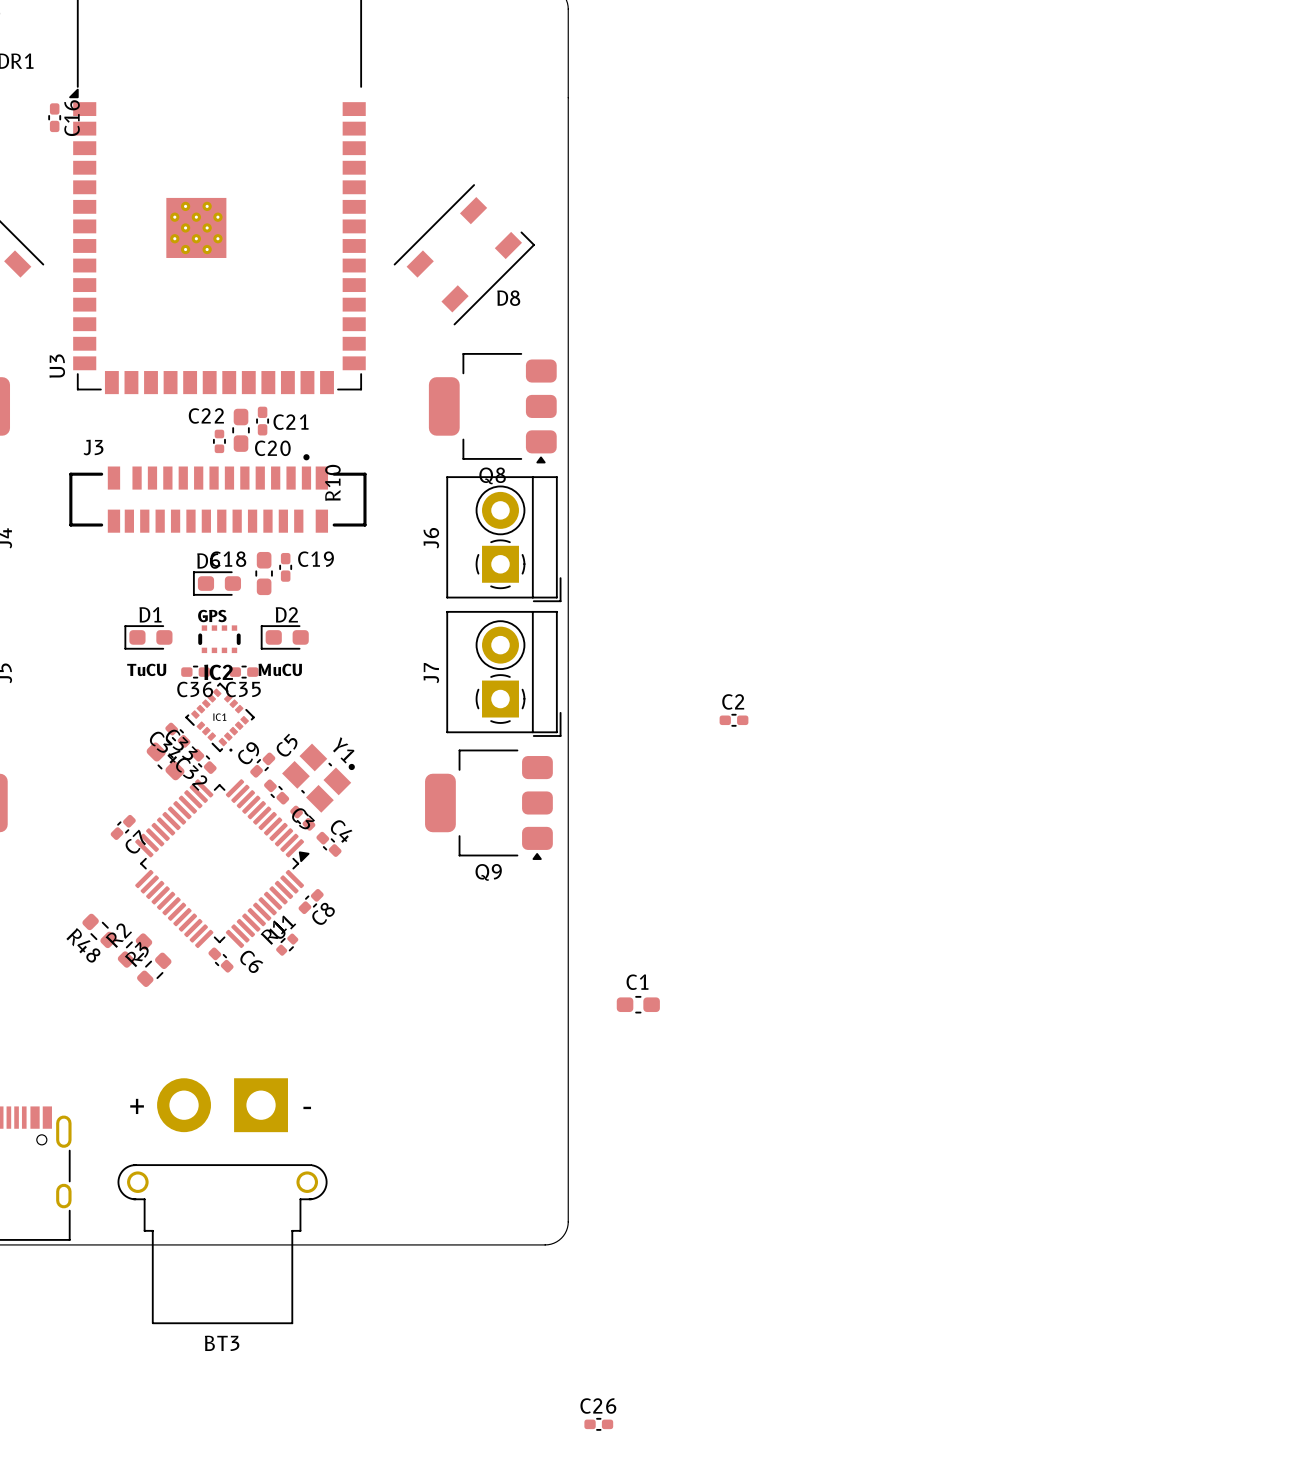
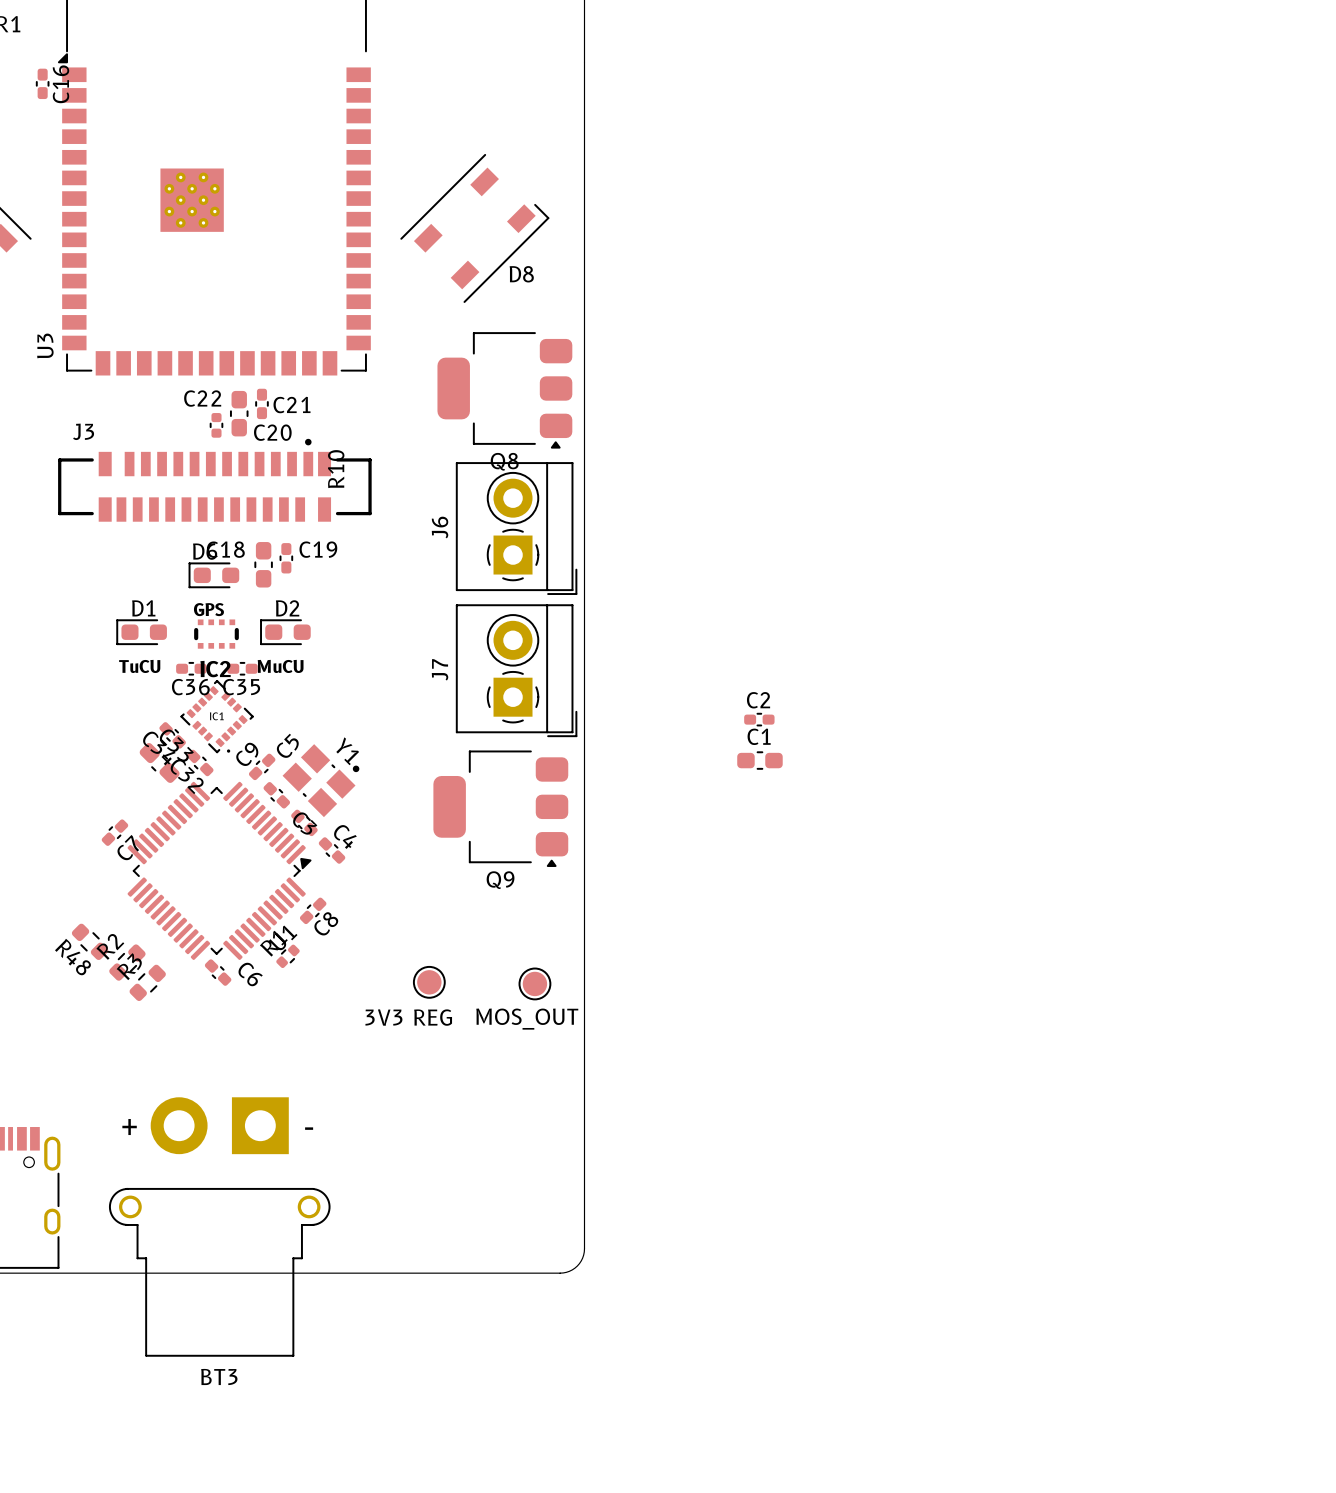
3V3 REG: none -> (429, 982)
MOS_OUT: none -> (534, 983)
C1 position: (638, 1004) -> (759, 760)
C26: (598, 1424) -> none

